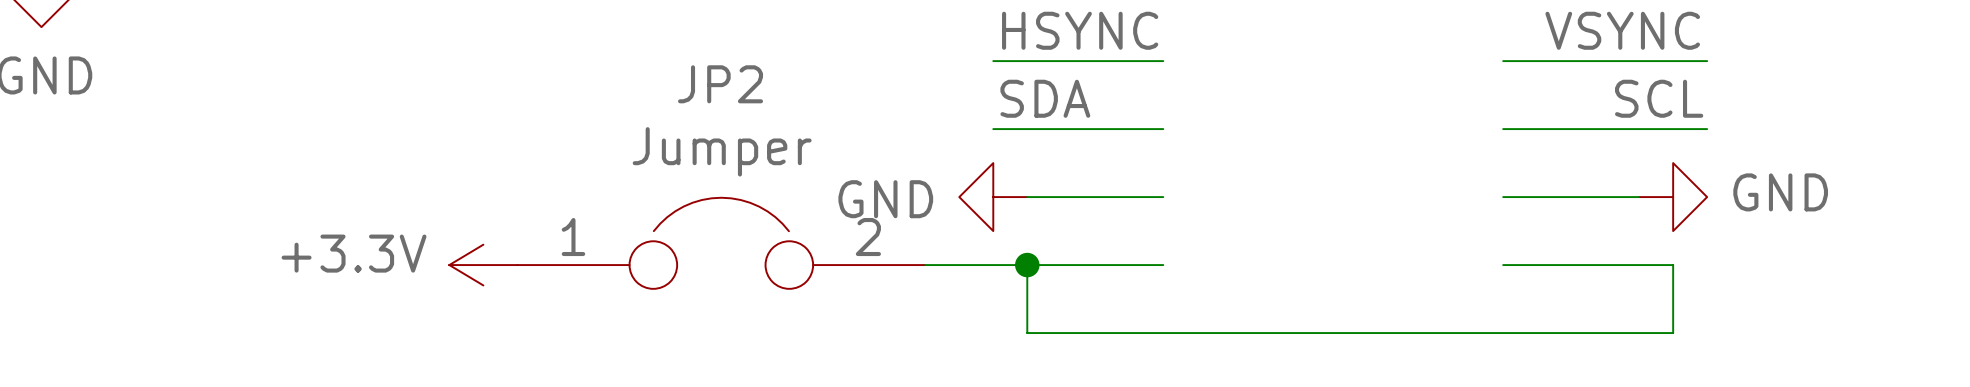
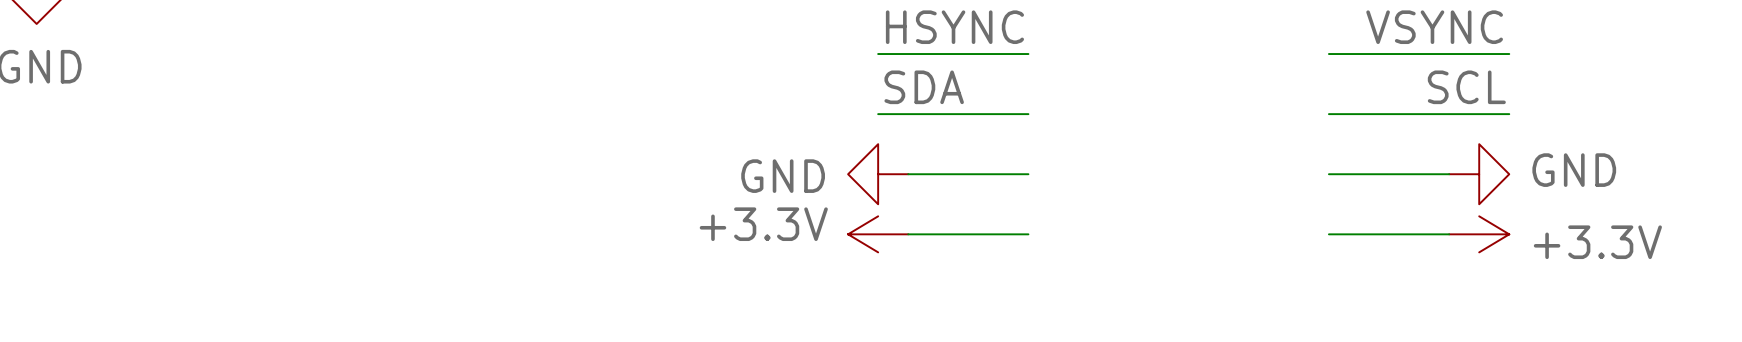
JP2: Jumper (721, 243) -> none
power symbol position: +3.3V (483, 265) -> +3.3V (878, 234)
wire: (925, 265) (1027, 265) (1027, 333) (1673, 333) (1673, 265) (1639, 265) -> none
junction: (1027, 265) -> none
power symbol: none -> +3.3V (1479, 234)

